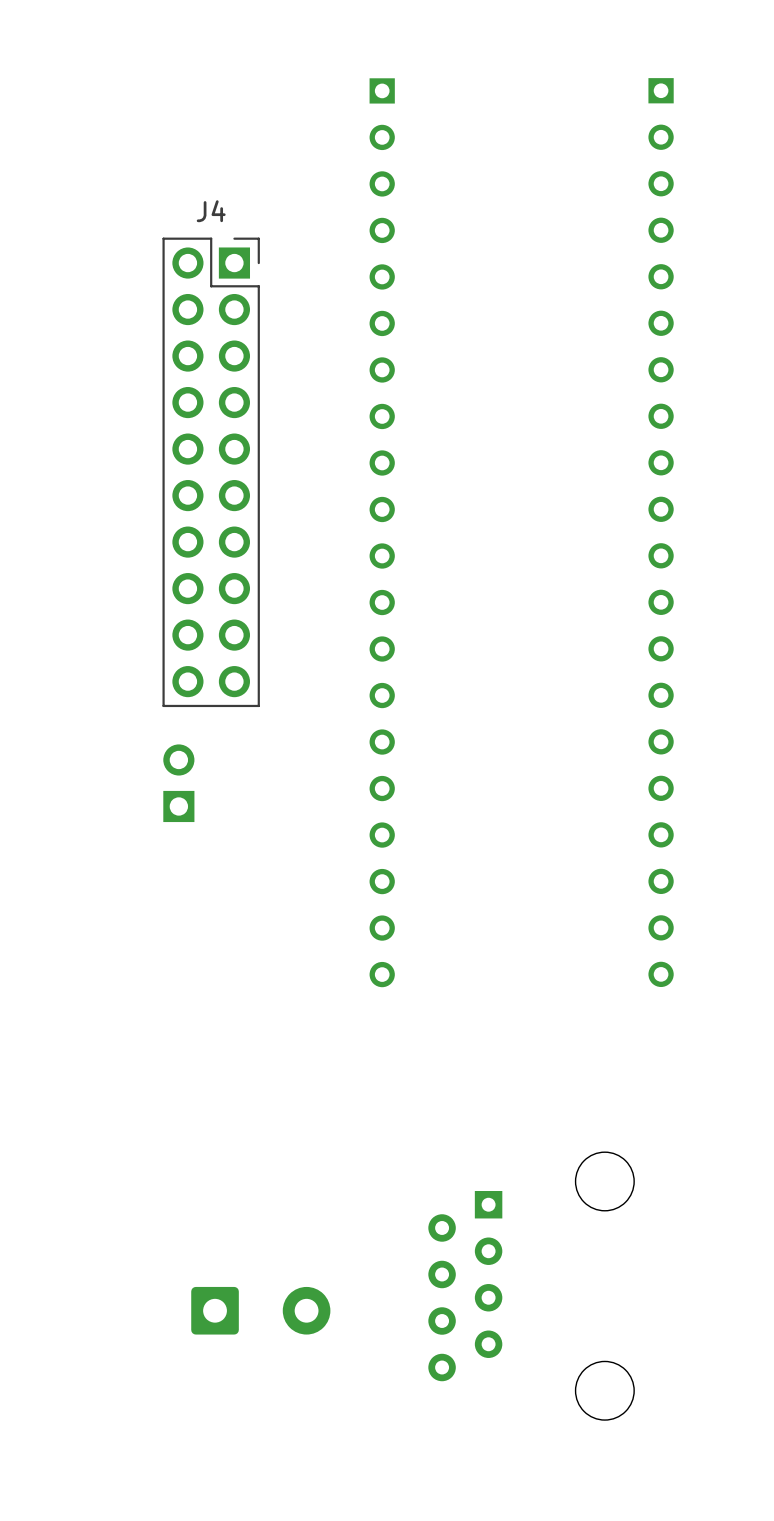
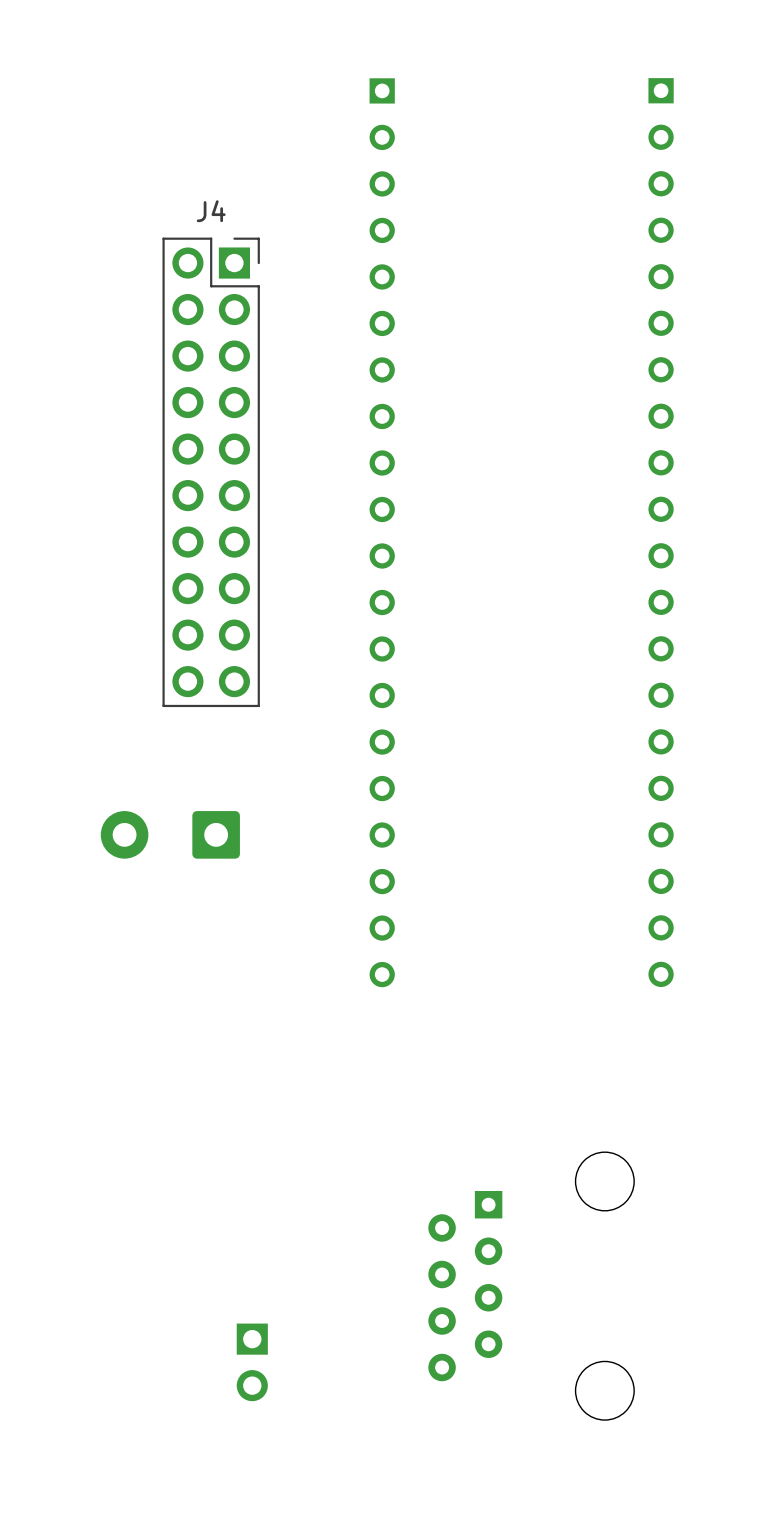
part: (178, 783) -> none
part: none -> (170, 834)
part: (260, 1310) -> none
part: none -> (252, 1362)

